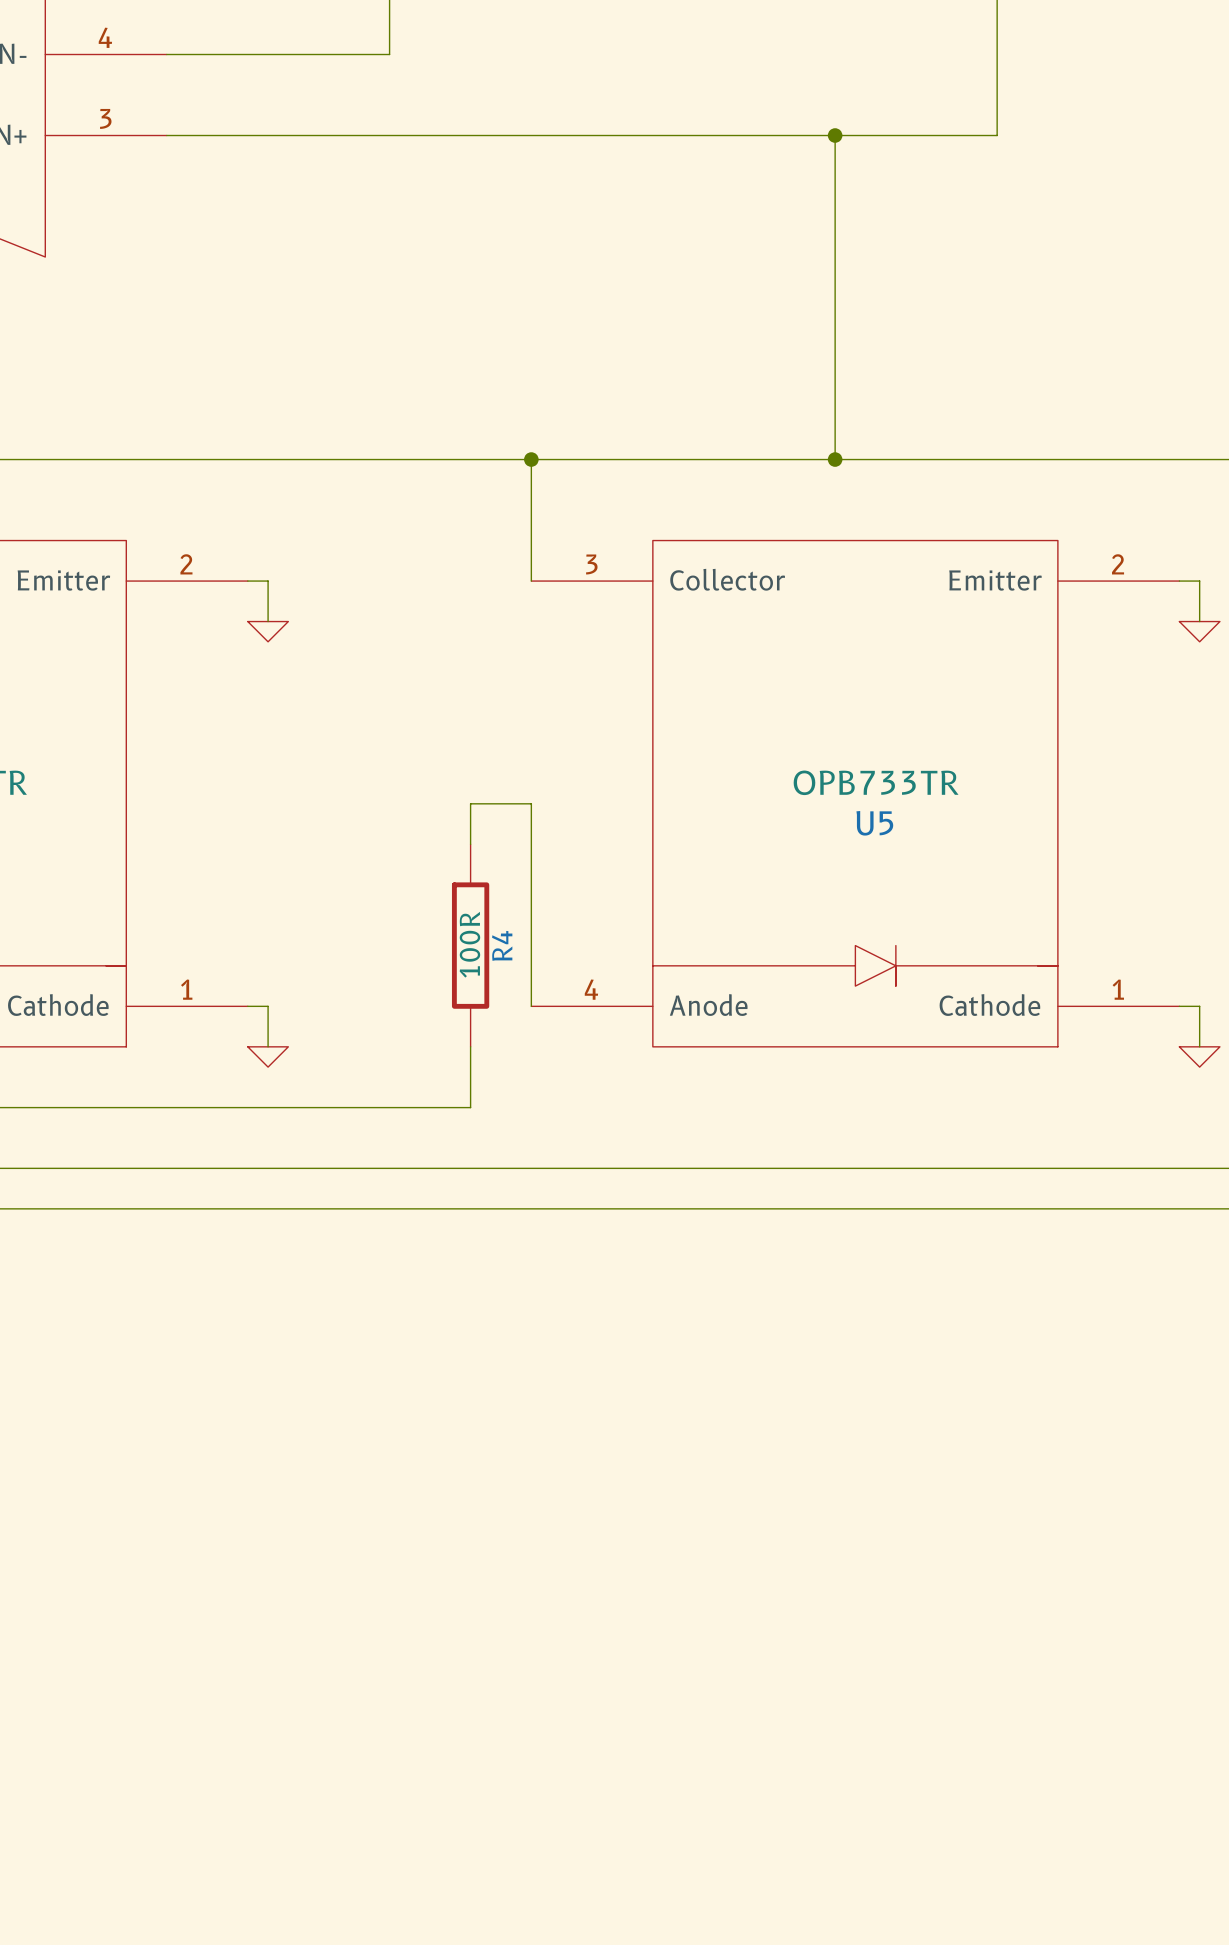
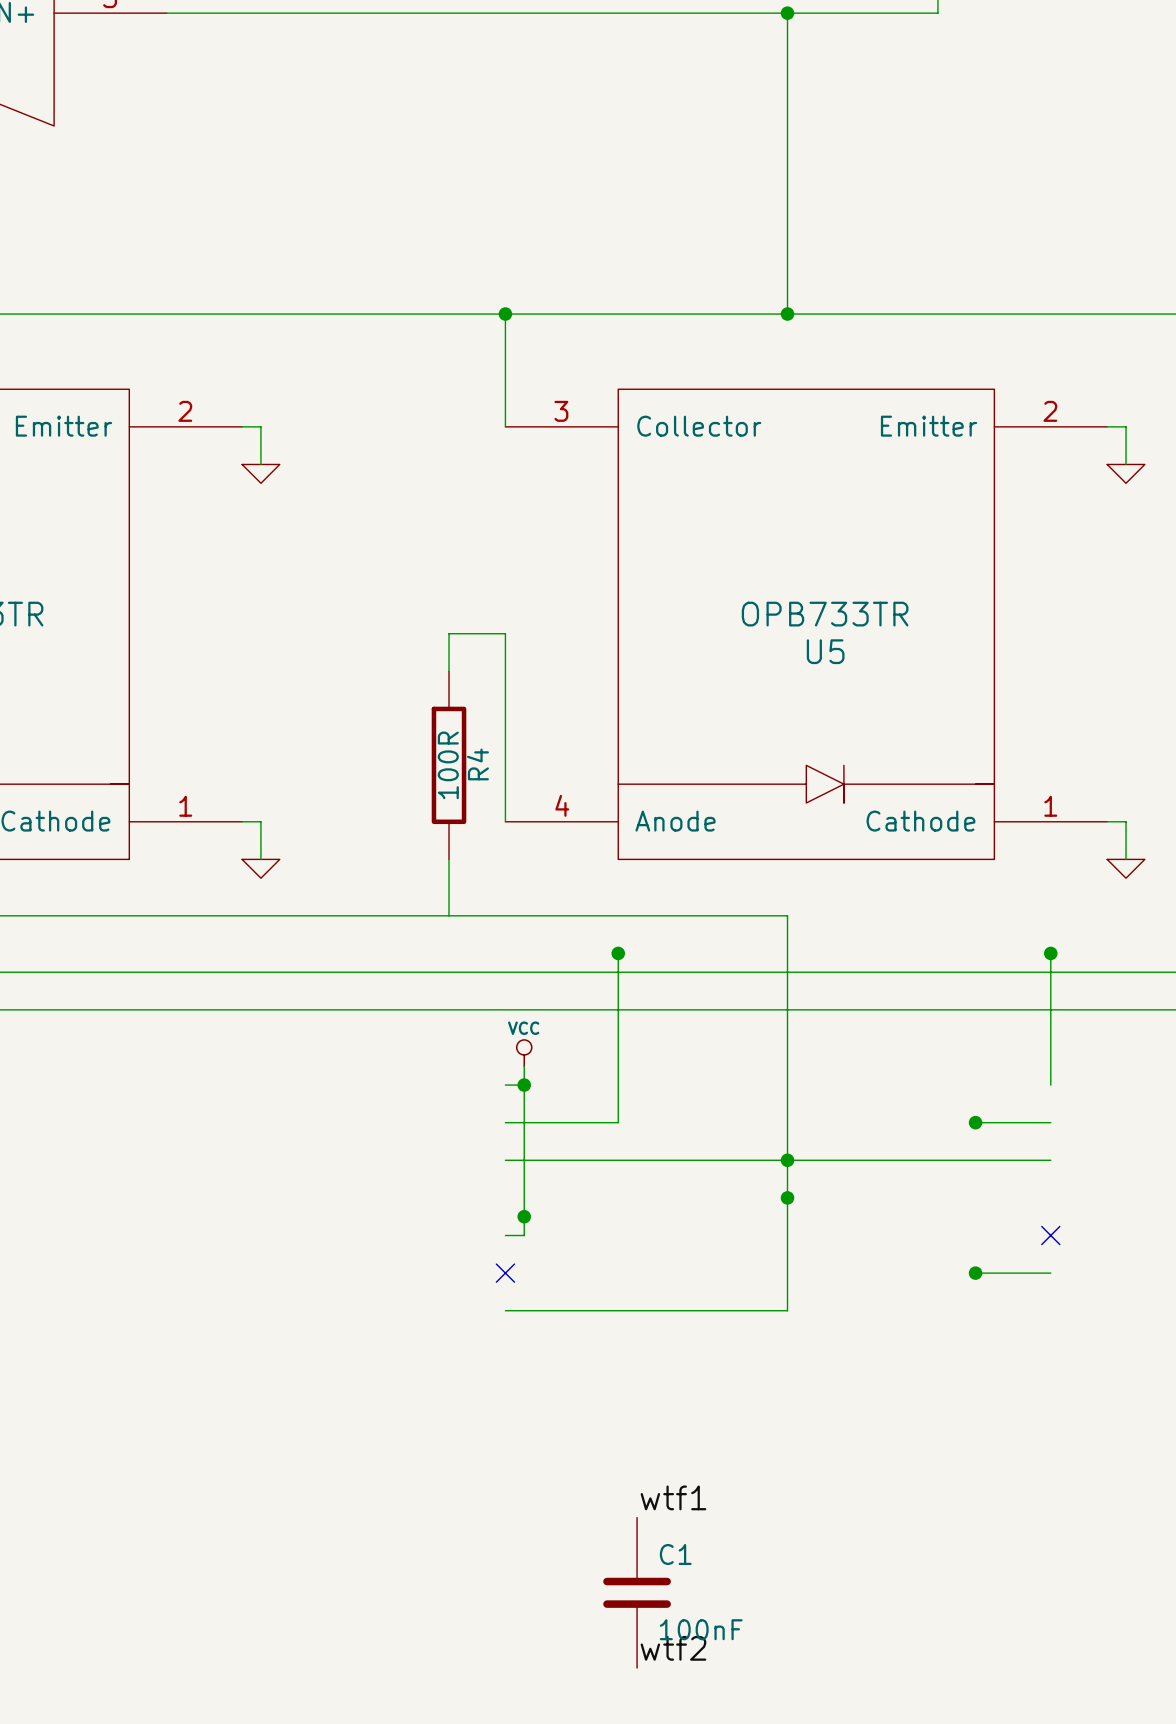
wire: none -> (449, 915) (787, 915) (787, 1310) (505, 1310)
wire: none -> (618, 953) (618, 1122) (505, 1122)
junction: none -> (618, 953)
wire: none -> (1050, 953) (1050, 1085)
junction: none -> (1050, 953)
power symbol: none -> VCC (524, 1053)
wire: none -> (524, 1066) (524, 1235) (505, 1235)
wire: none -> (505, 1085) (524, 1085)
junction: none -> (524, 1085)
wire: none -> (975, 1122) (1050, 1122)
junction: none -> (975, 1122)
wire: none -> (505, 1160) (1050, 1160)
junction: none -> (787, 1160)
junction: none -> (787, 1197)
junction: none -> (524, 1216)
no-connect mark: none -> (1050, 1235)
no-connect mark: none -> (505, 1273)
wire: none -> (975, 1273) (1050, 1273)
junction: none -> (975, 1273)
label: none -> wtf1 (673, 1497)
C1: none -> 100nF (637, 1592)
label: none -> wtf2 (673, 1648)

